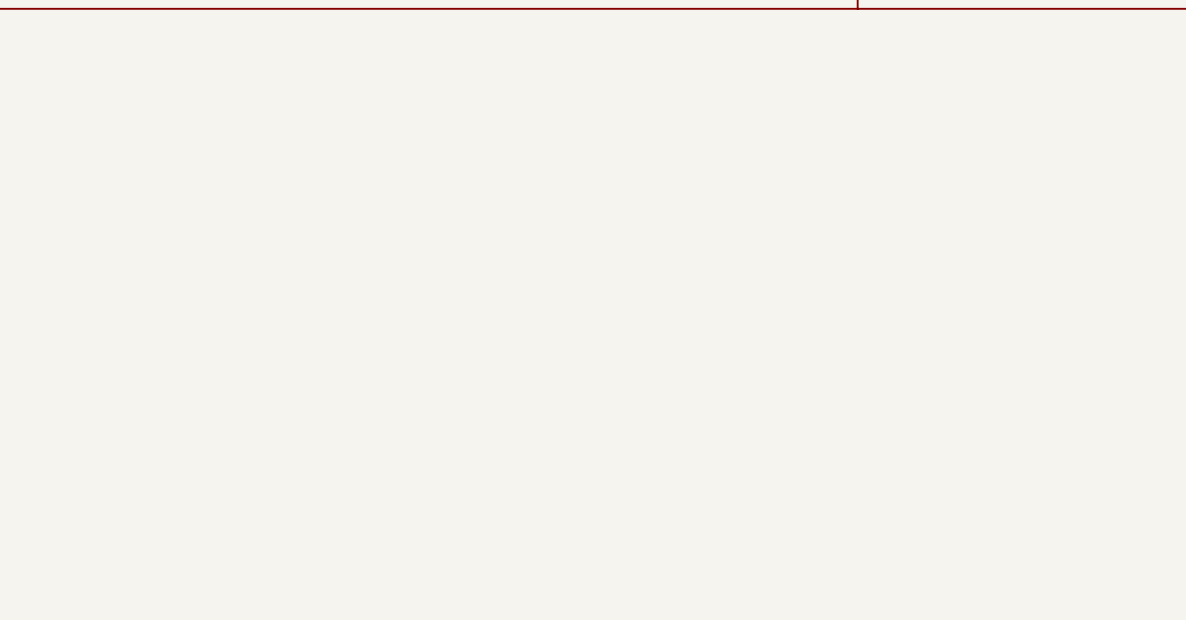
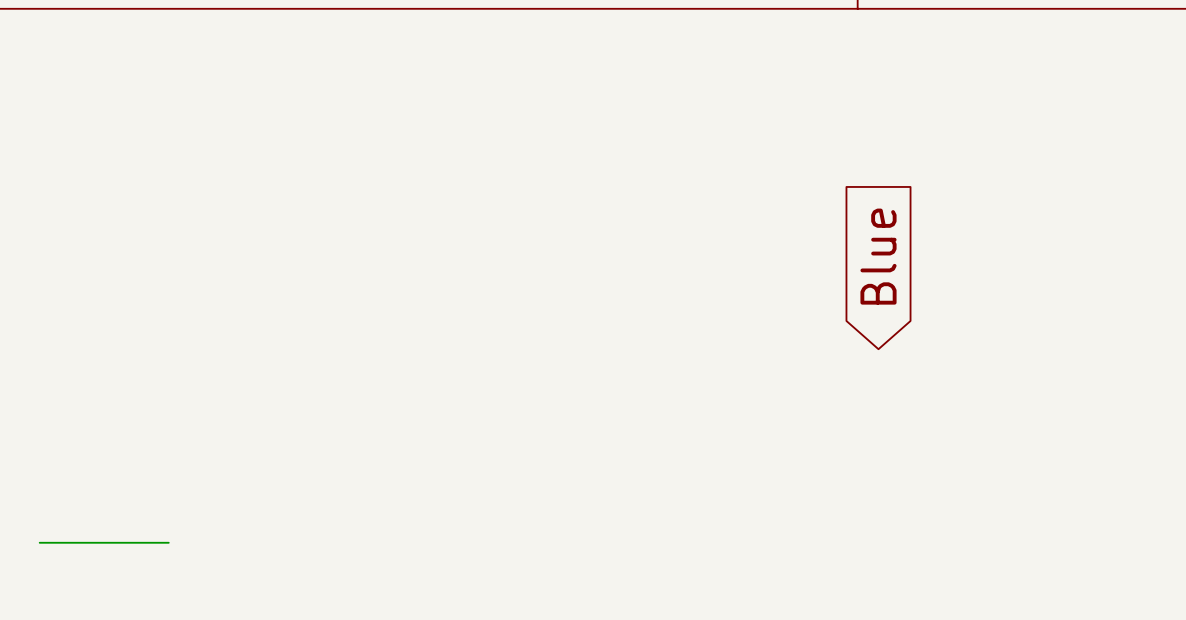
global label: none -> Blue (878, 256)
wire: none -> (39, 542) (168, 542)

